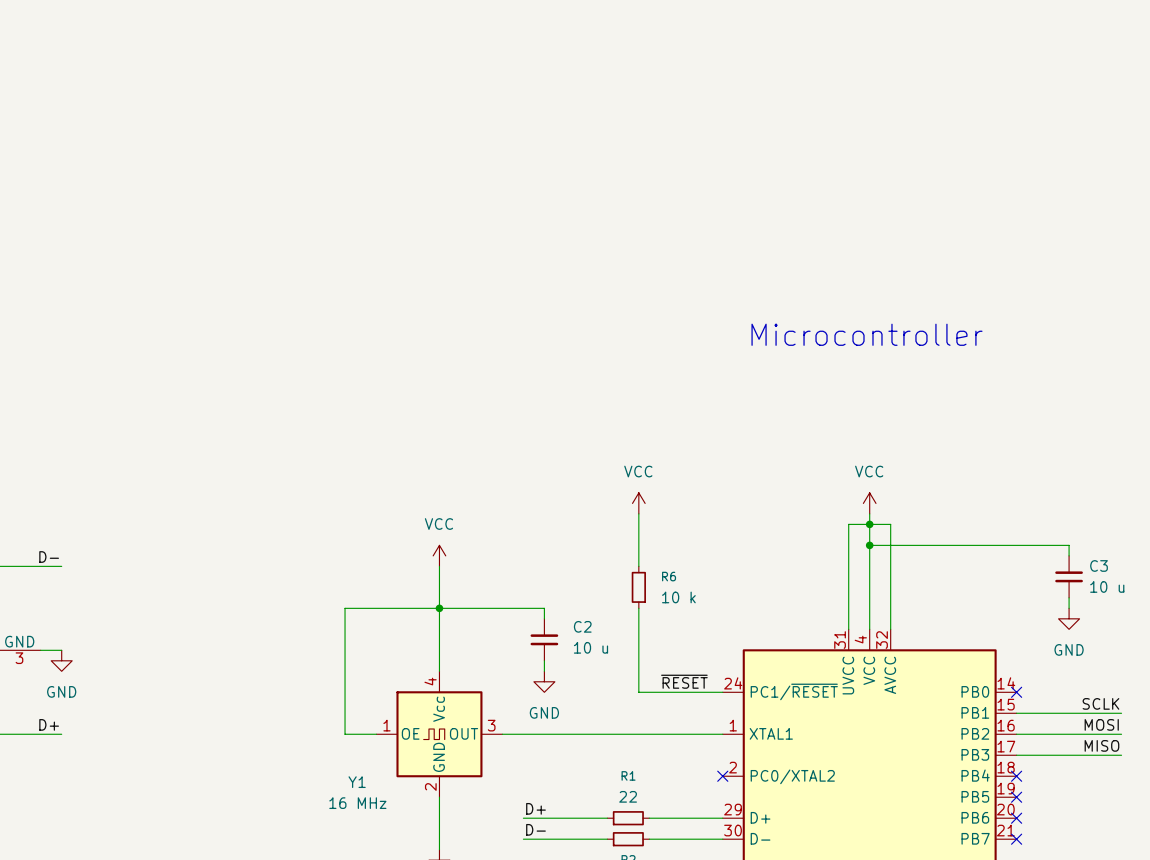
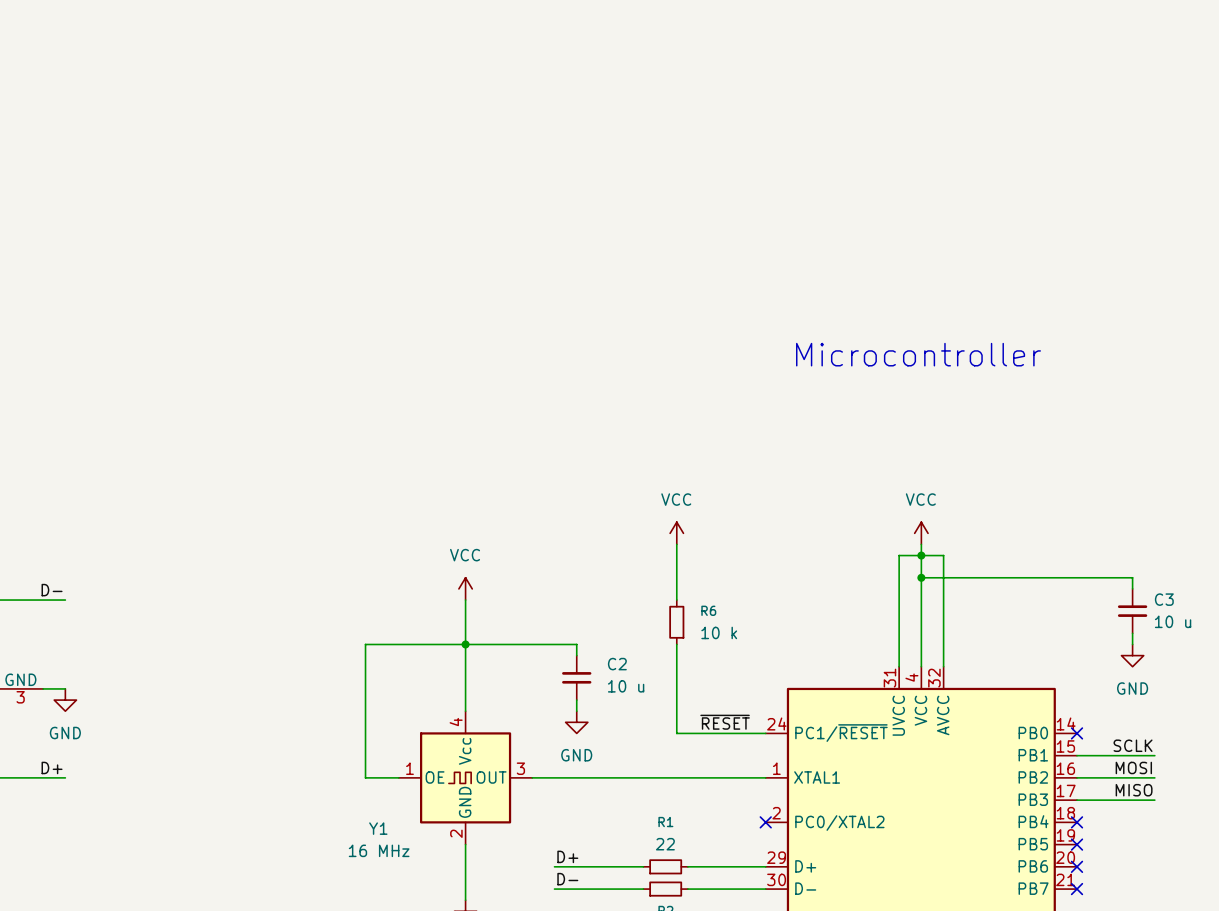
label position: SCLK (1100, 703) -> SCLK (1133, 745)
wire: (1090, 713) (1121, 713) -> none
label position: MOSI (1101, 724) -> MOSI (1133, 767)
wire: (1090, 734) (1121, 734) -> none
label position: MISO (1101, 745) -> MISO (1134, 790)
wire: (1090, 755) (1121, 755) -> none

